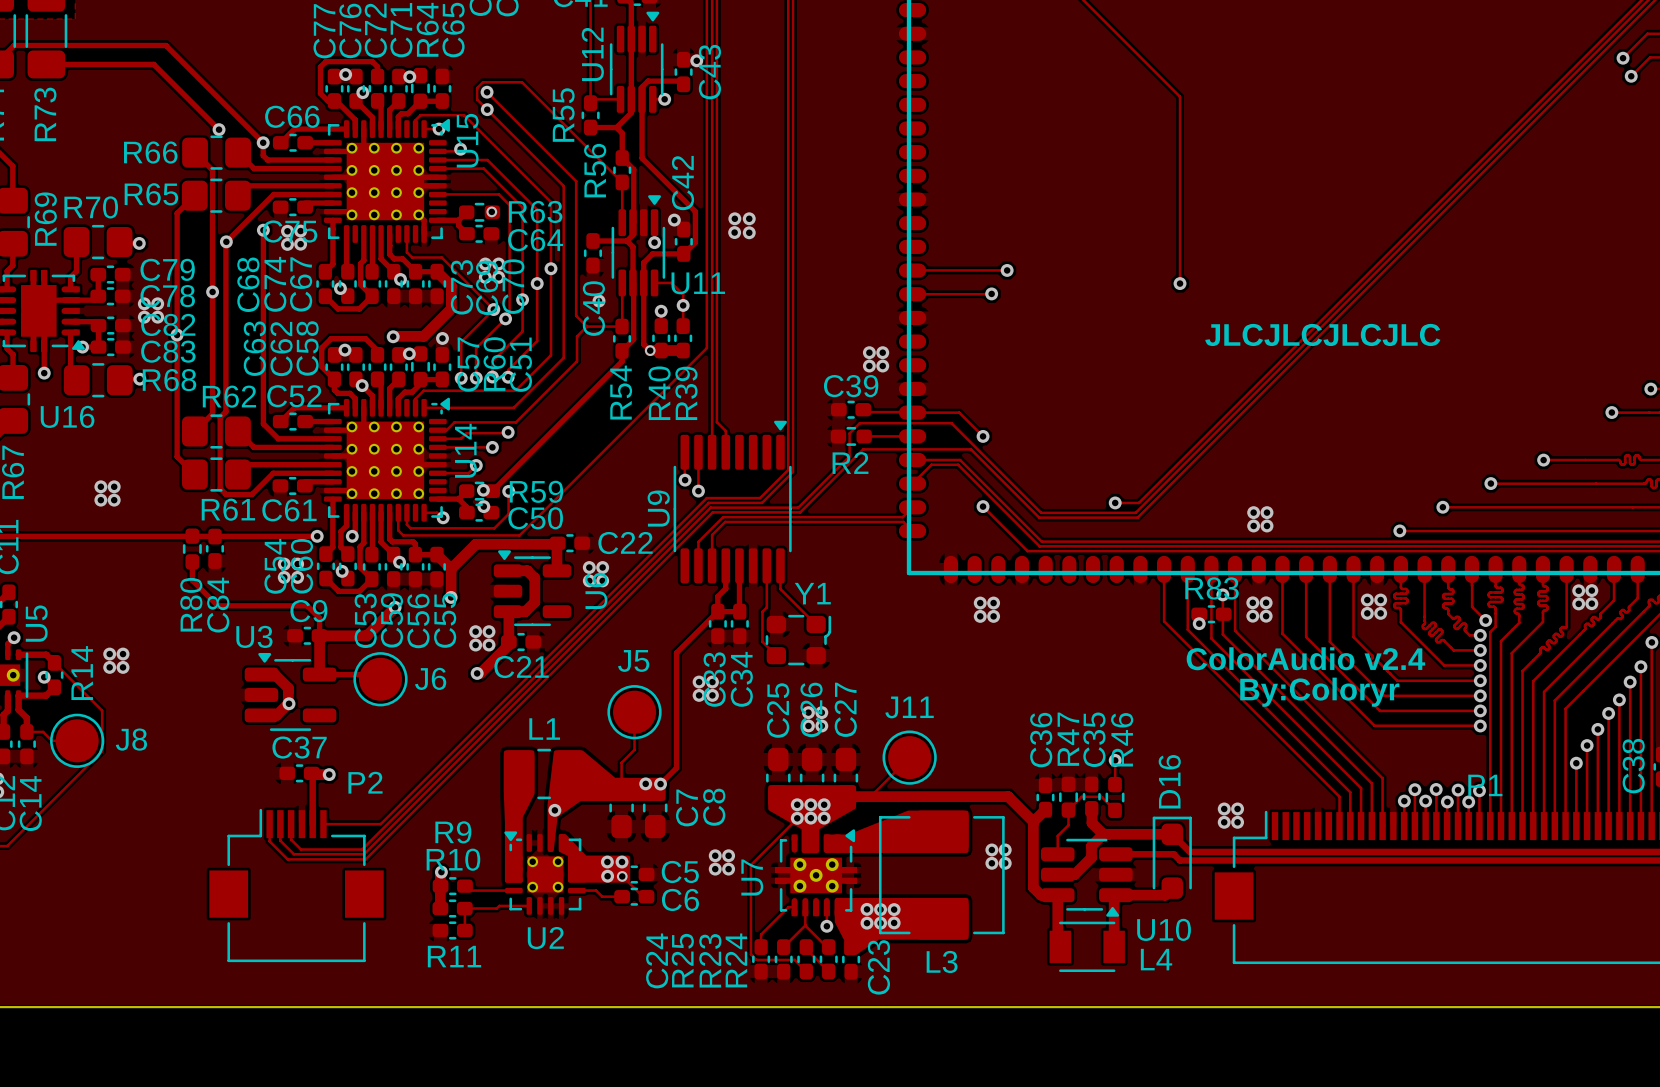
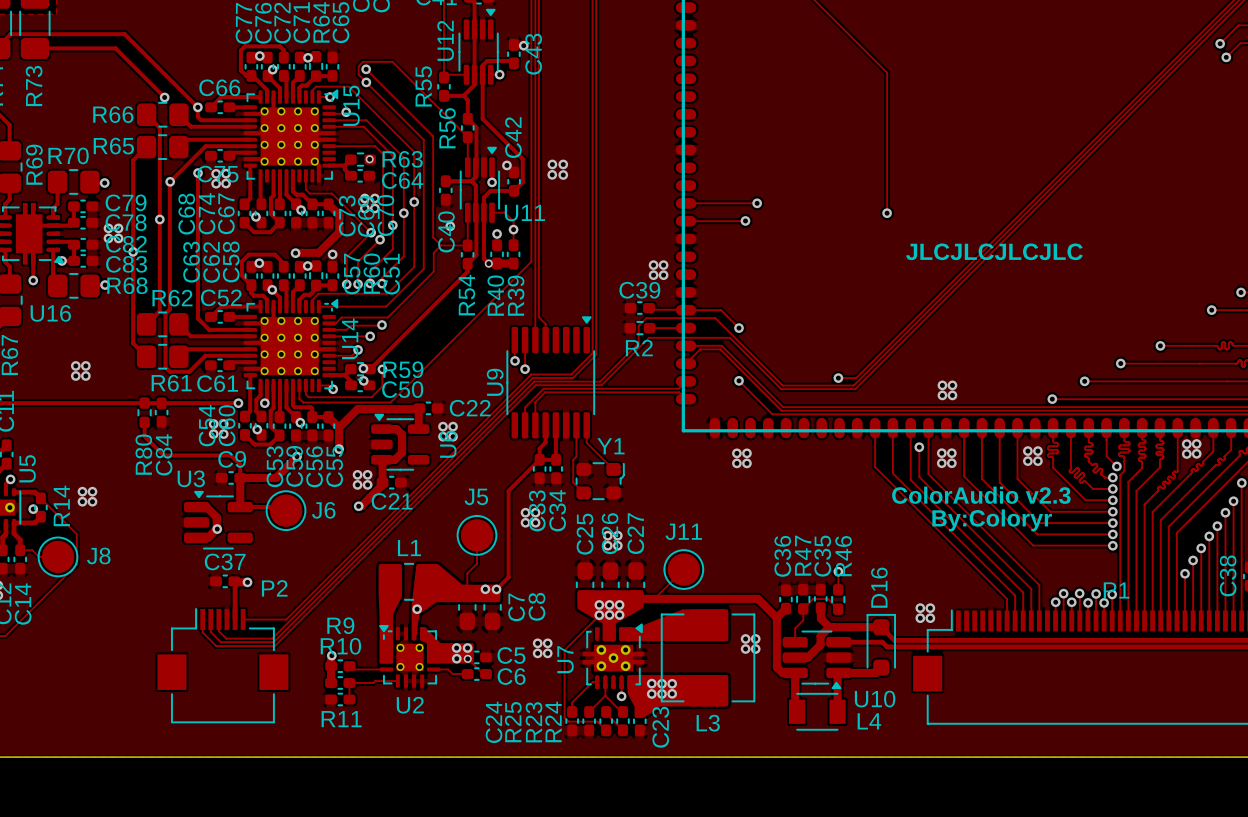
R83: (1211, 614) -> none
via: (1199, 623) -> none
text: ColorAudio v2.4 (1305, 658) -> ColorAudio v2.3 (981, 495)

